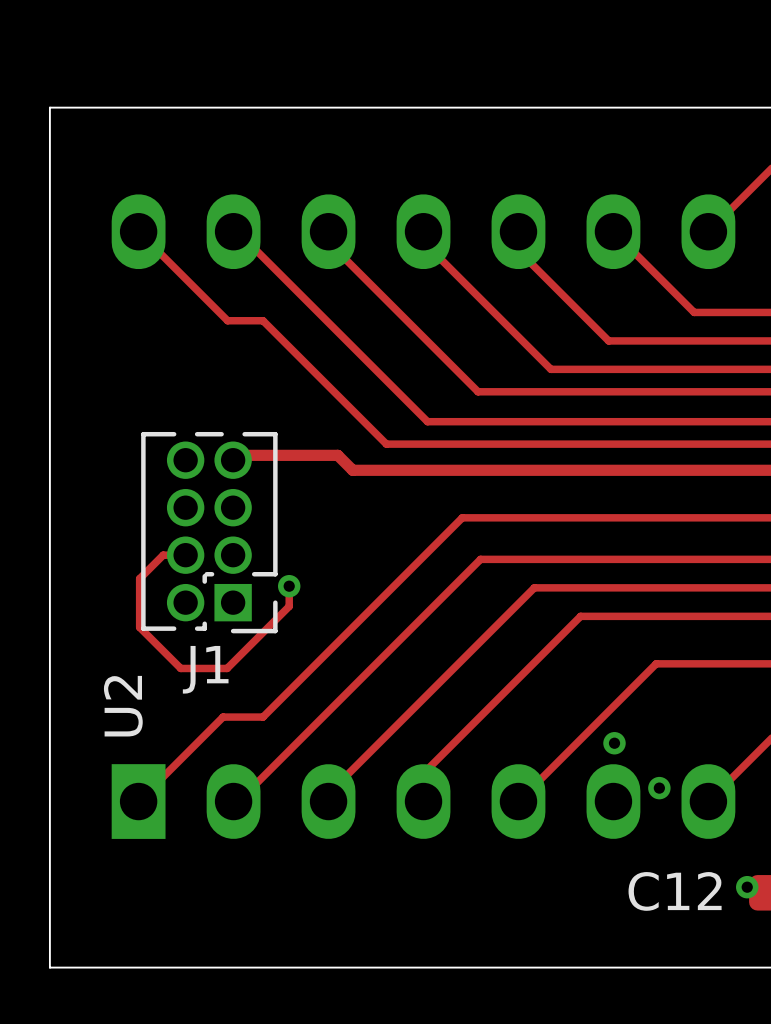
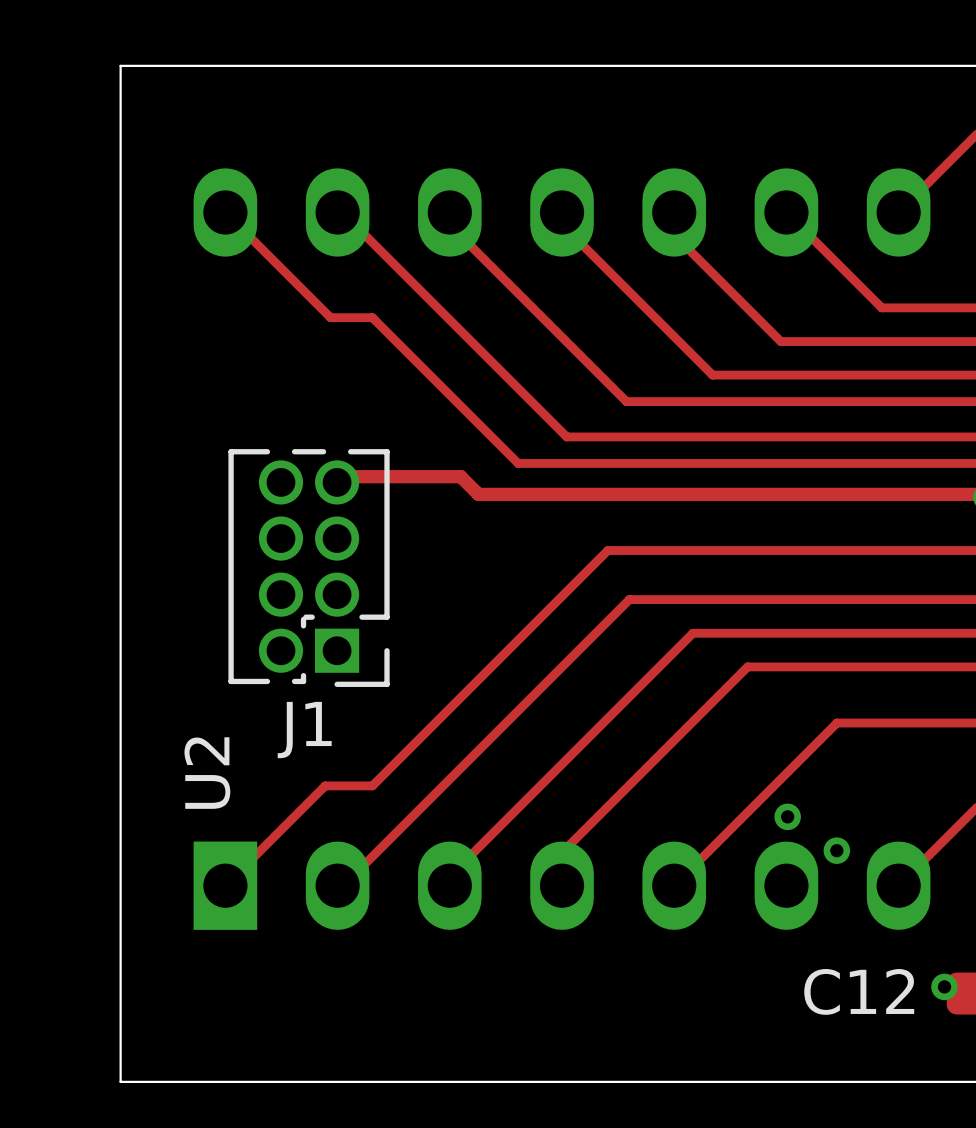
track: (185, 555) (163, 555) (139, 578) (139, 627) (180, 668) (227, 668) (289, 606) (289, 586) -> none
via: (289, 586) -> none
via position: (659, 788) -> (836, 850)

